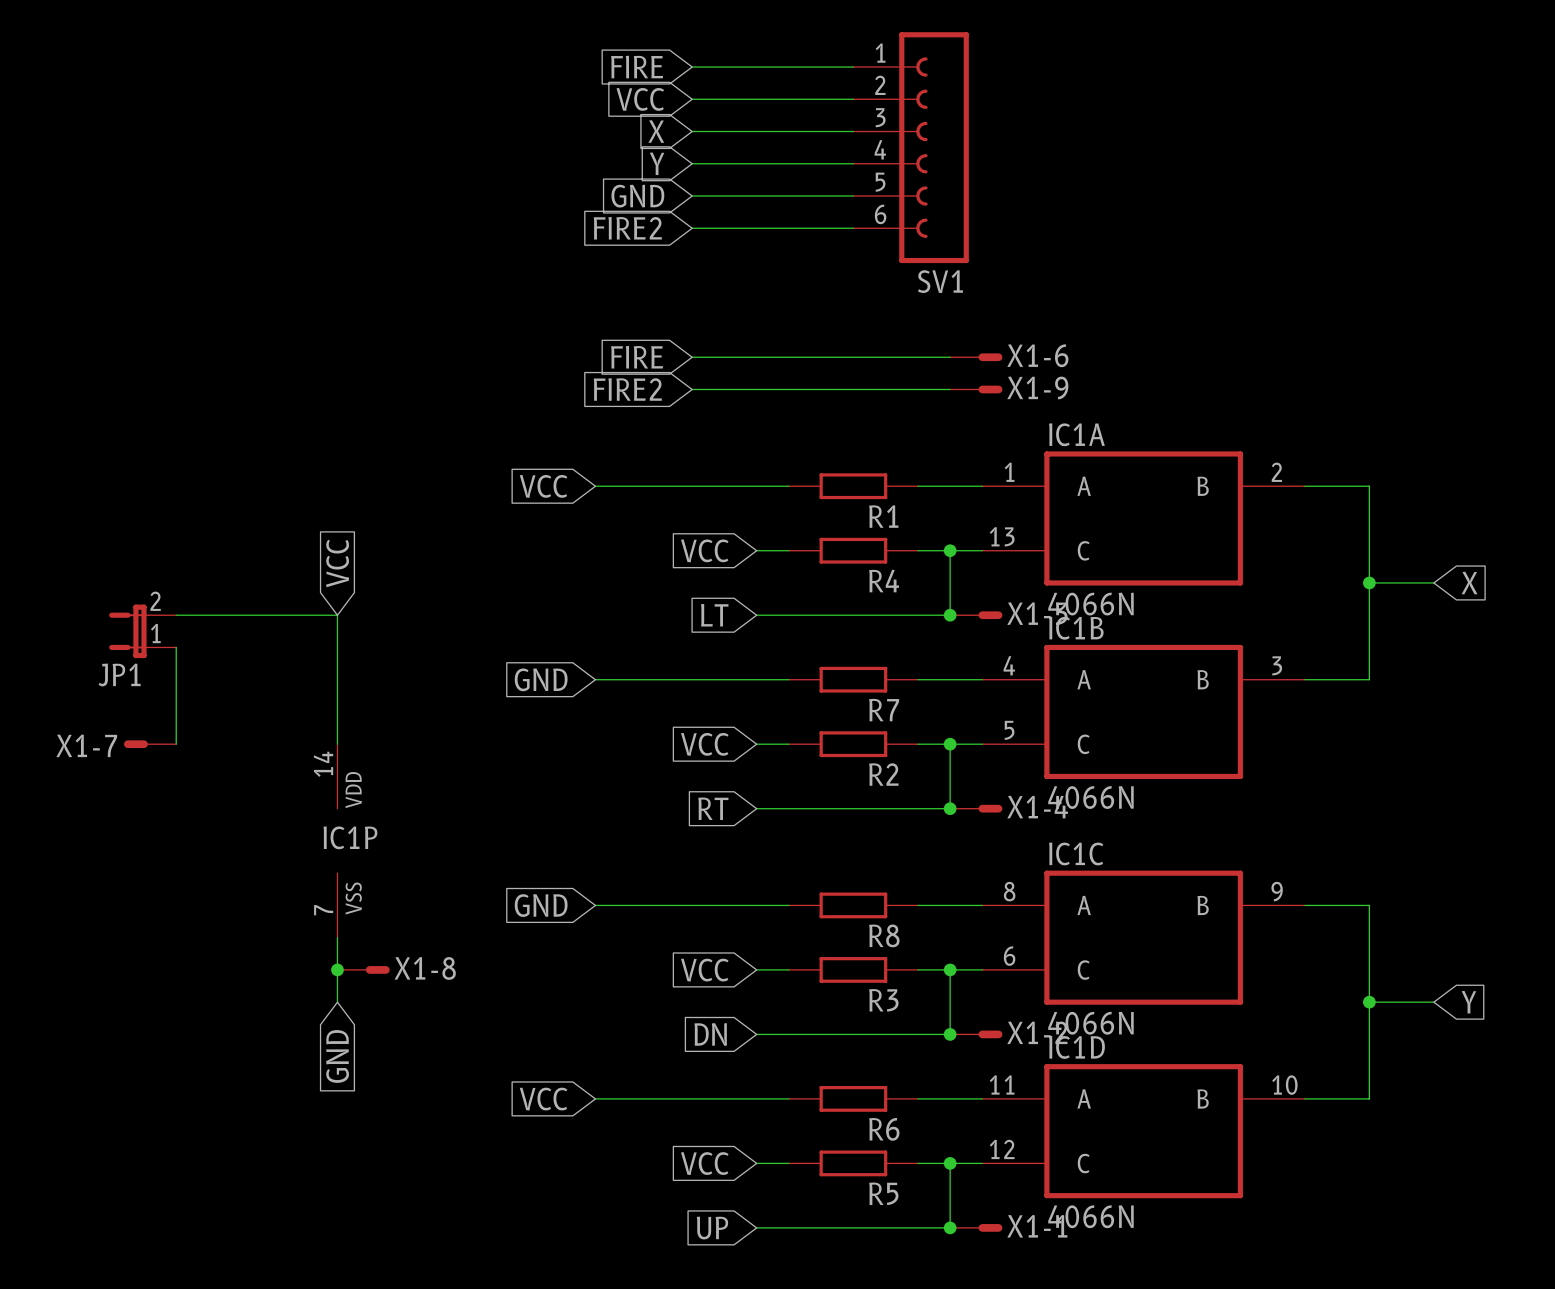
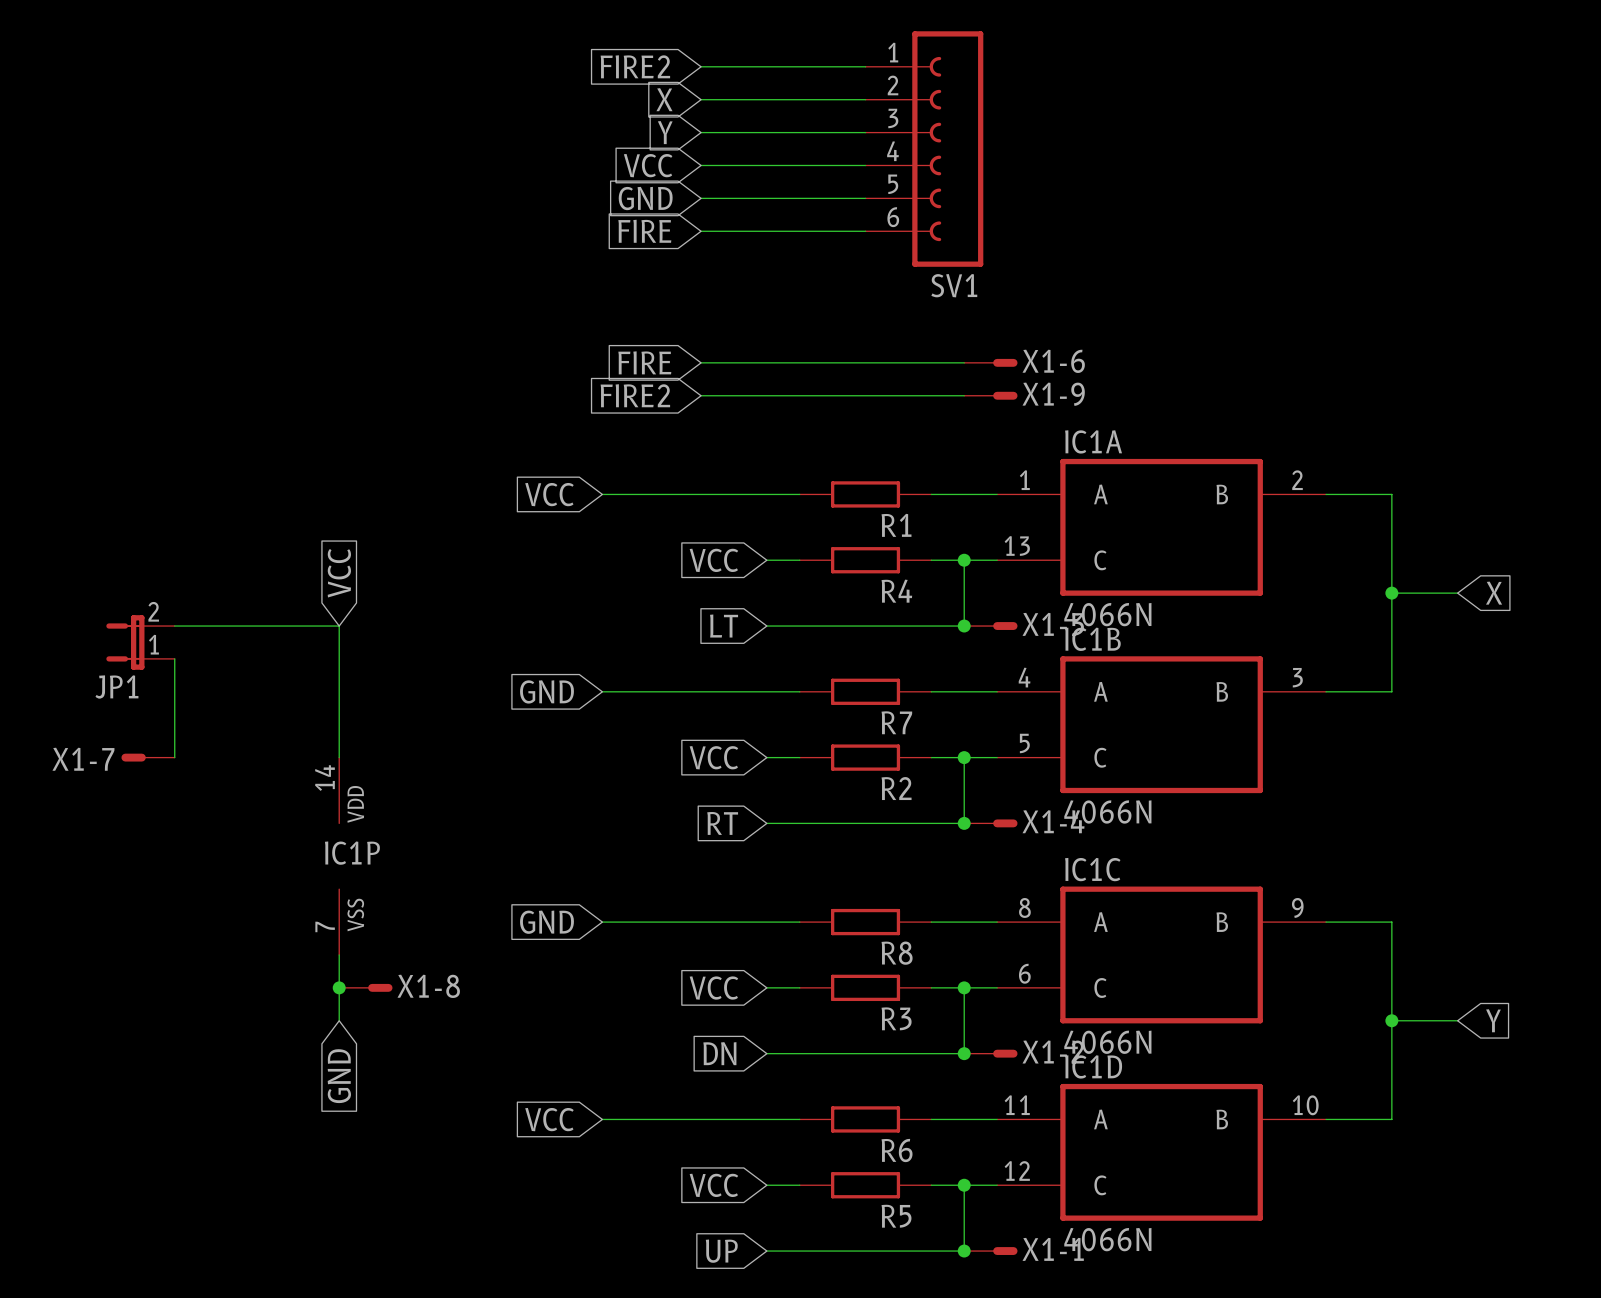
global label: FIRE (637, 67) -> FIRE2 (635, 66)
global label: VCC (640, 99) -> X (664, 99)
global label: X (656, 131) -> Y (665, 132)
global label: Y (657, 163) -> VCC (648, 165)
global label: FIRE2 (627, 228) -> FIRE (644, 231)

